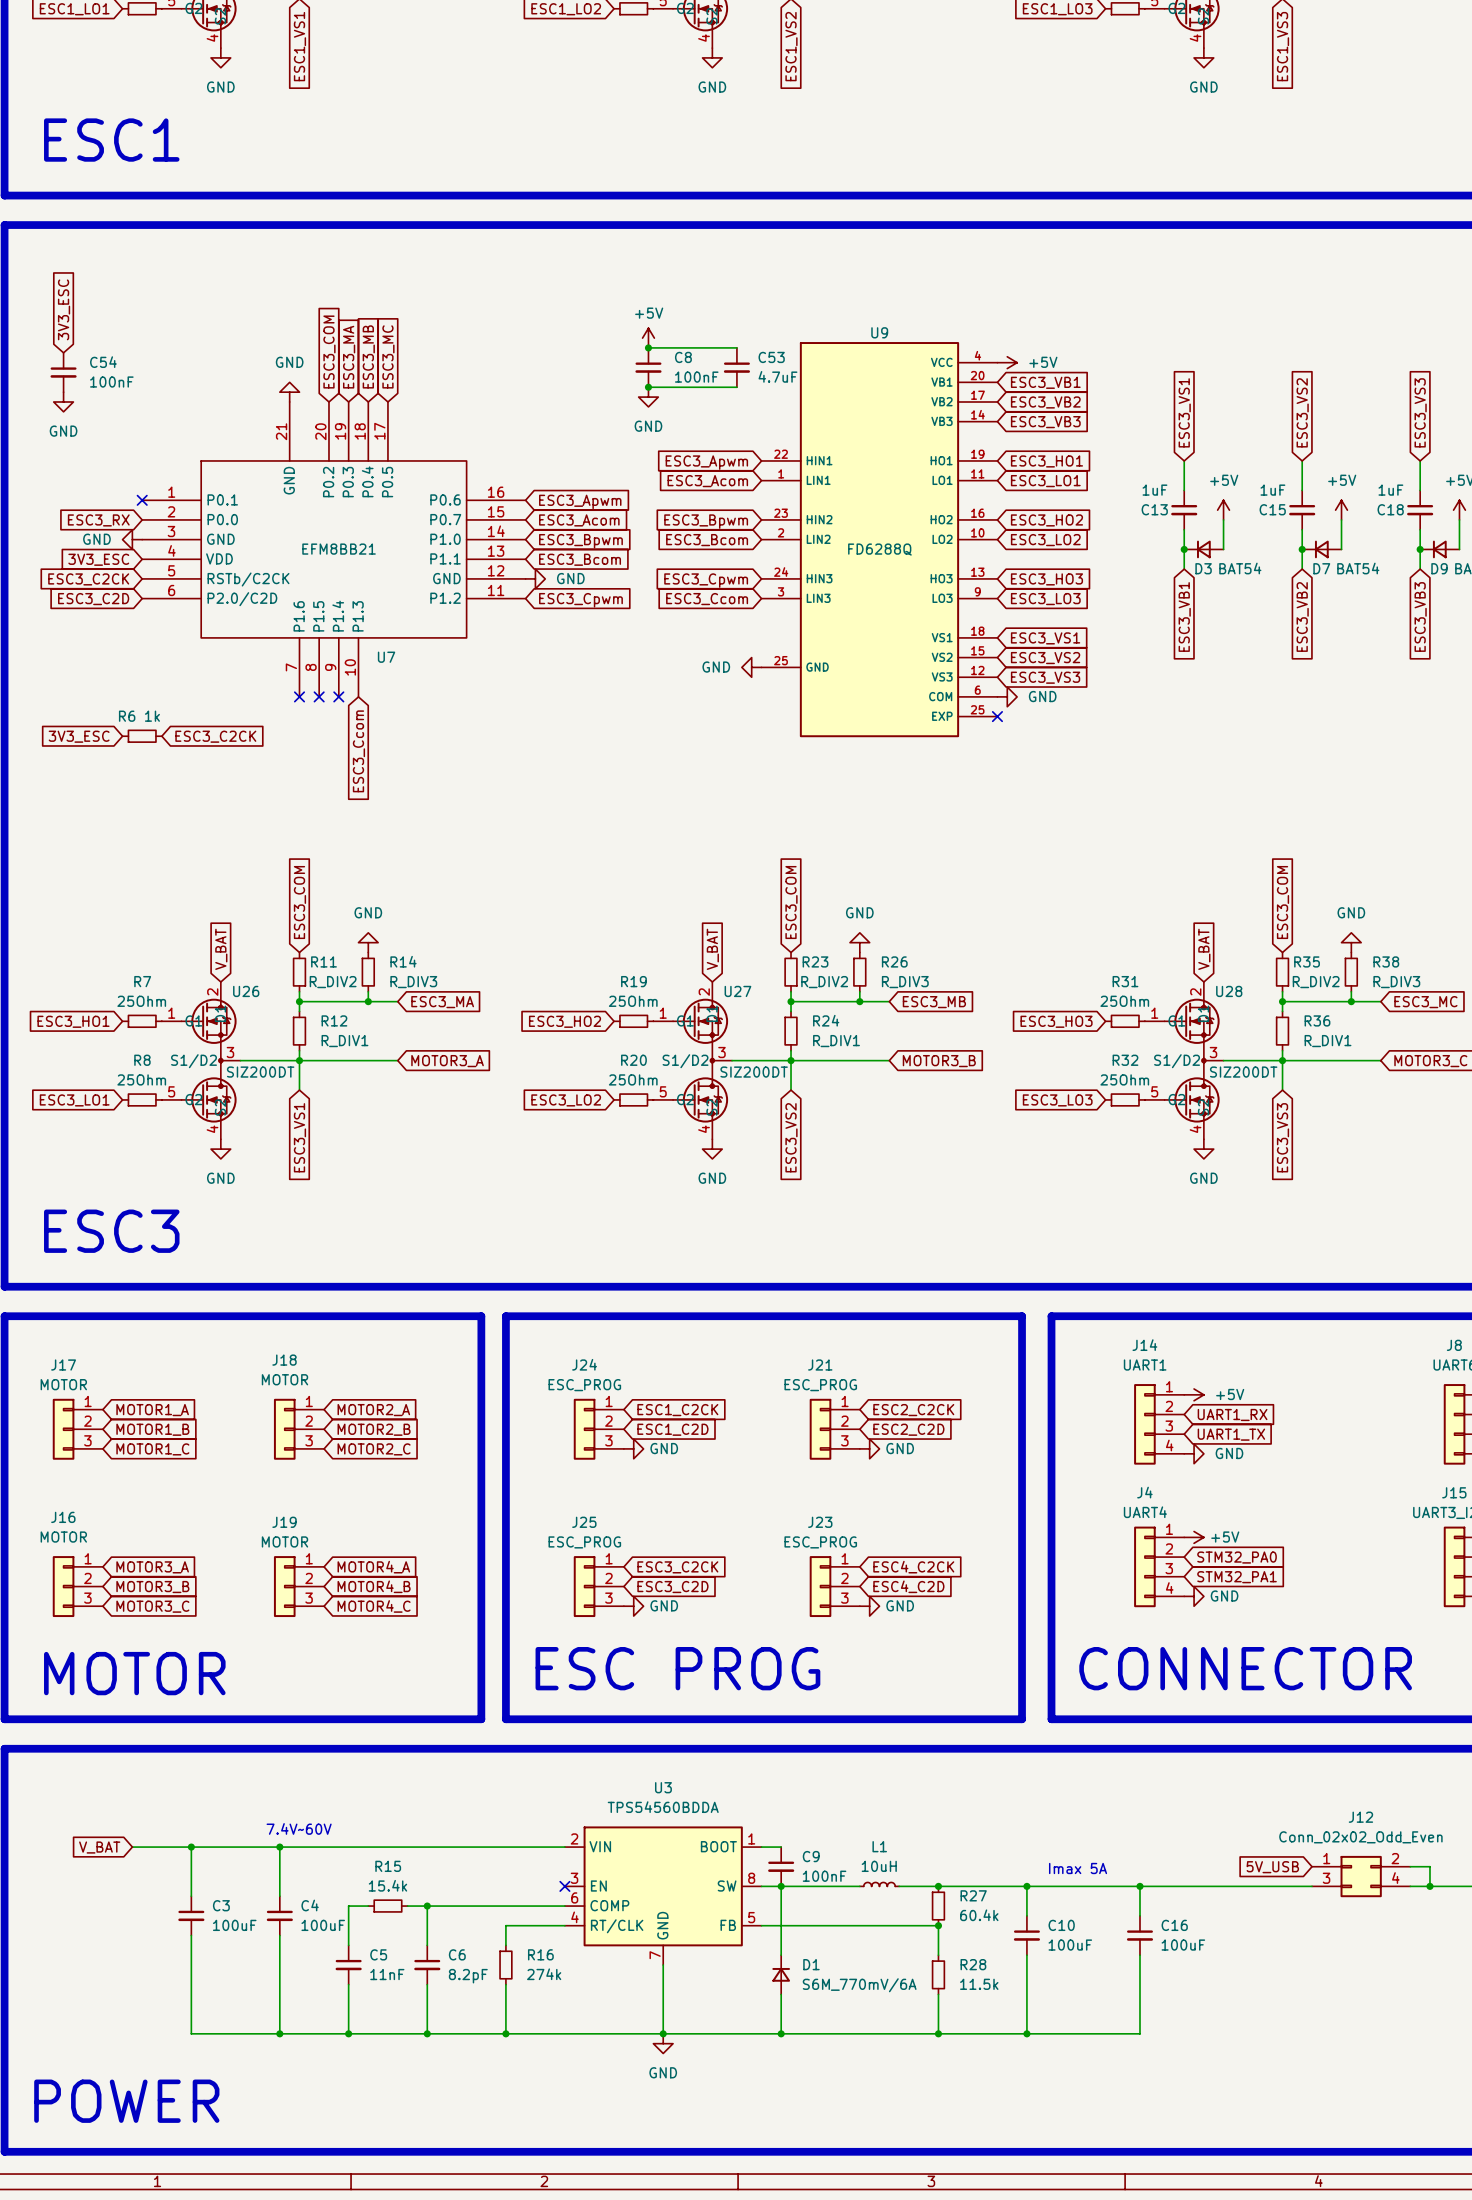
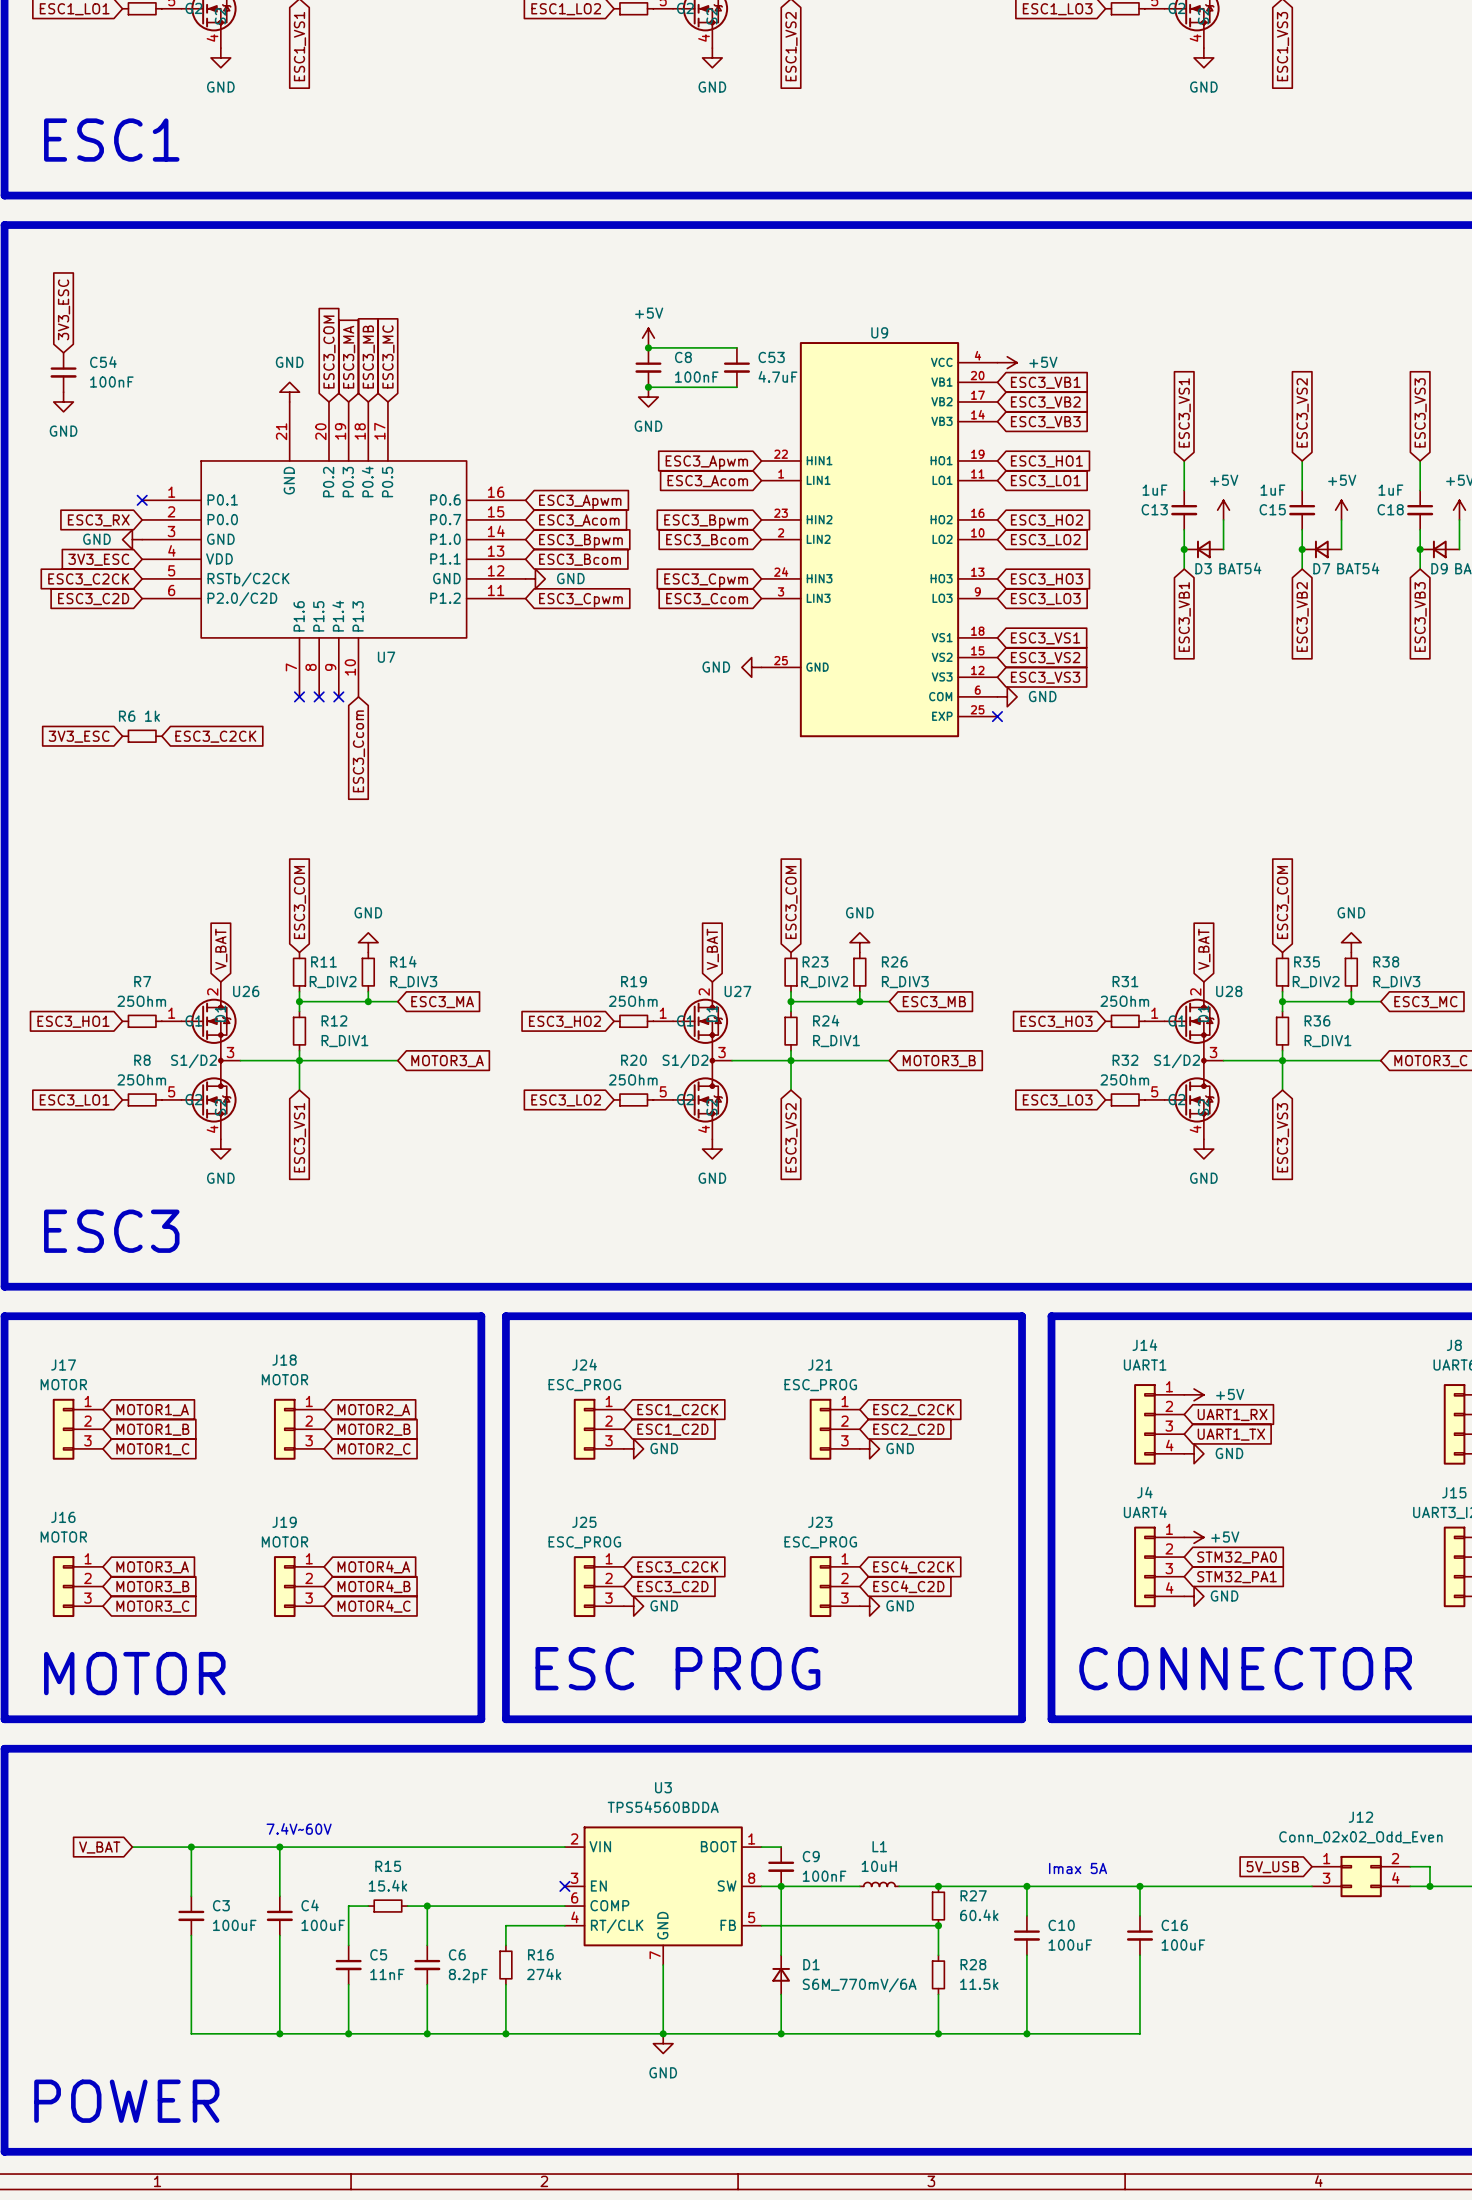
U7 value: EFM8BB21 (339, 549) -> none
U9 value: FD6288Q (879, 549) -> none
U26 value: SIZ200DT (260, 1072) -> none
U27 value: SIZ200DT (754, 1072) -> none
U28 value: SIZ200DT (1243, 1072) -> none

